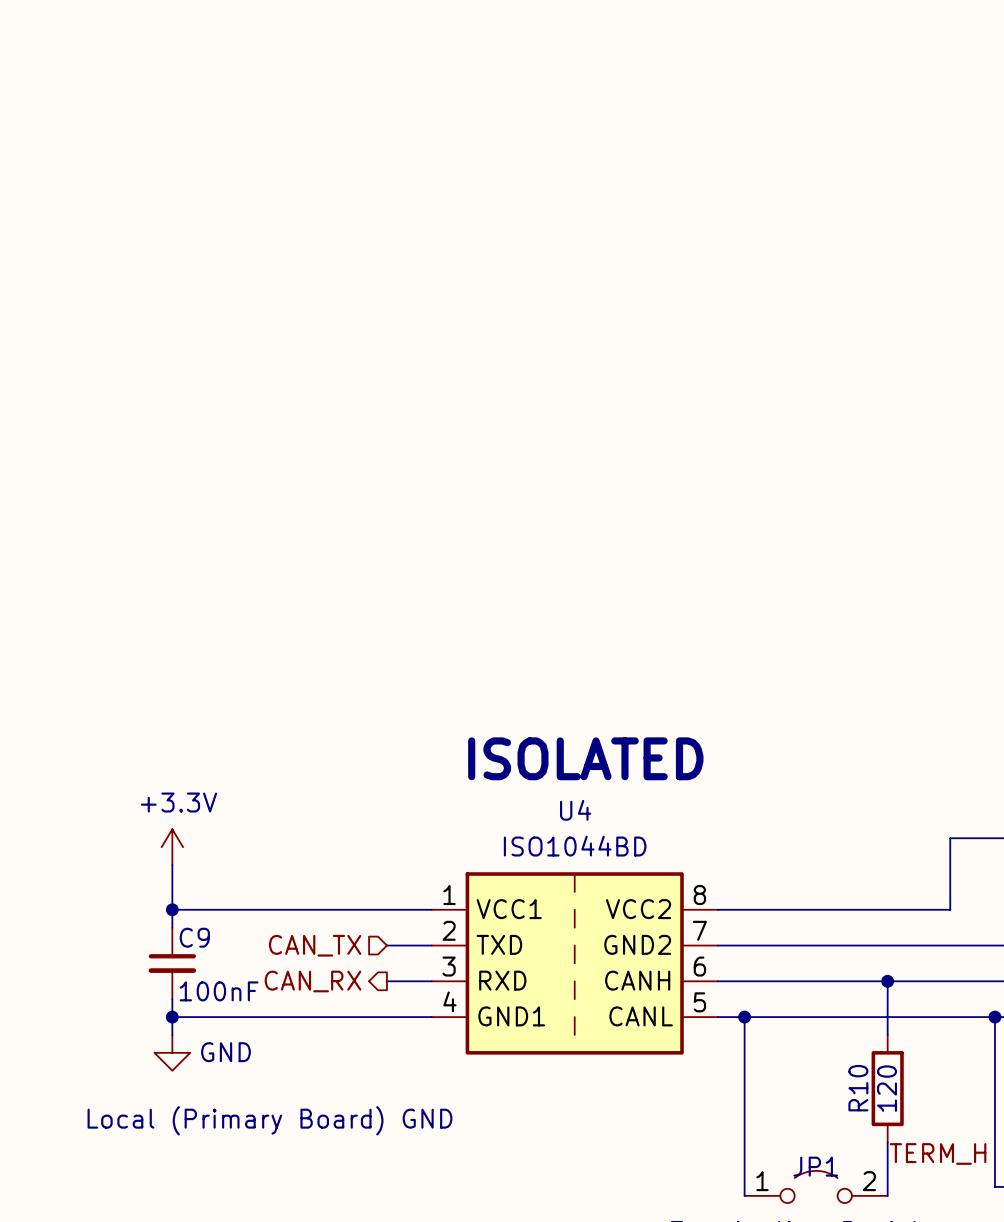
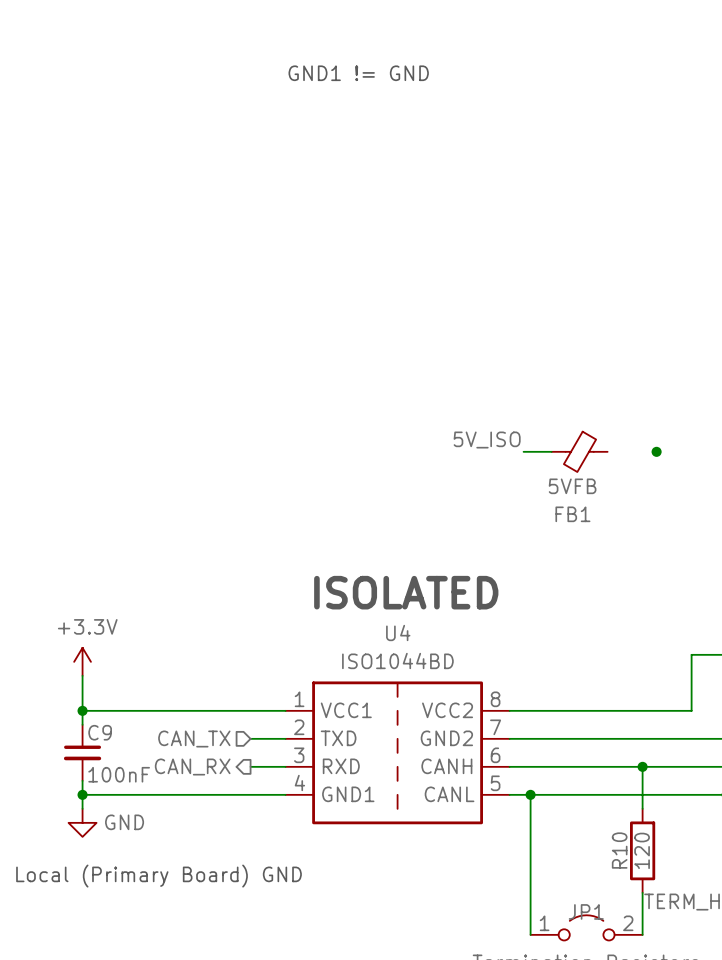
text: none -> GND1 != GND (358, 73)
label: none -> 5V_ISO (487, 440)
wire: none -> (523, 451) (551, 451)
FB1: none -> 5VFB (579, 451)
junction: none -> (656, 451)

